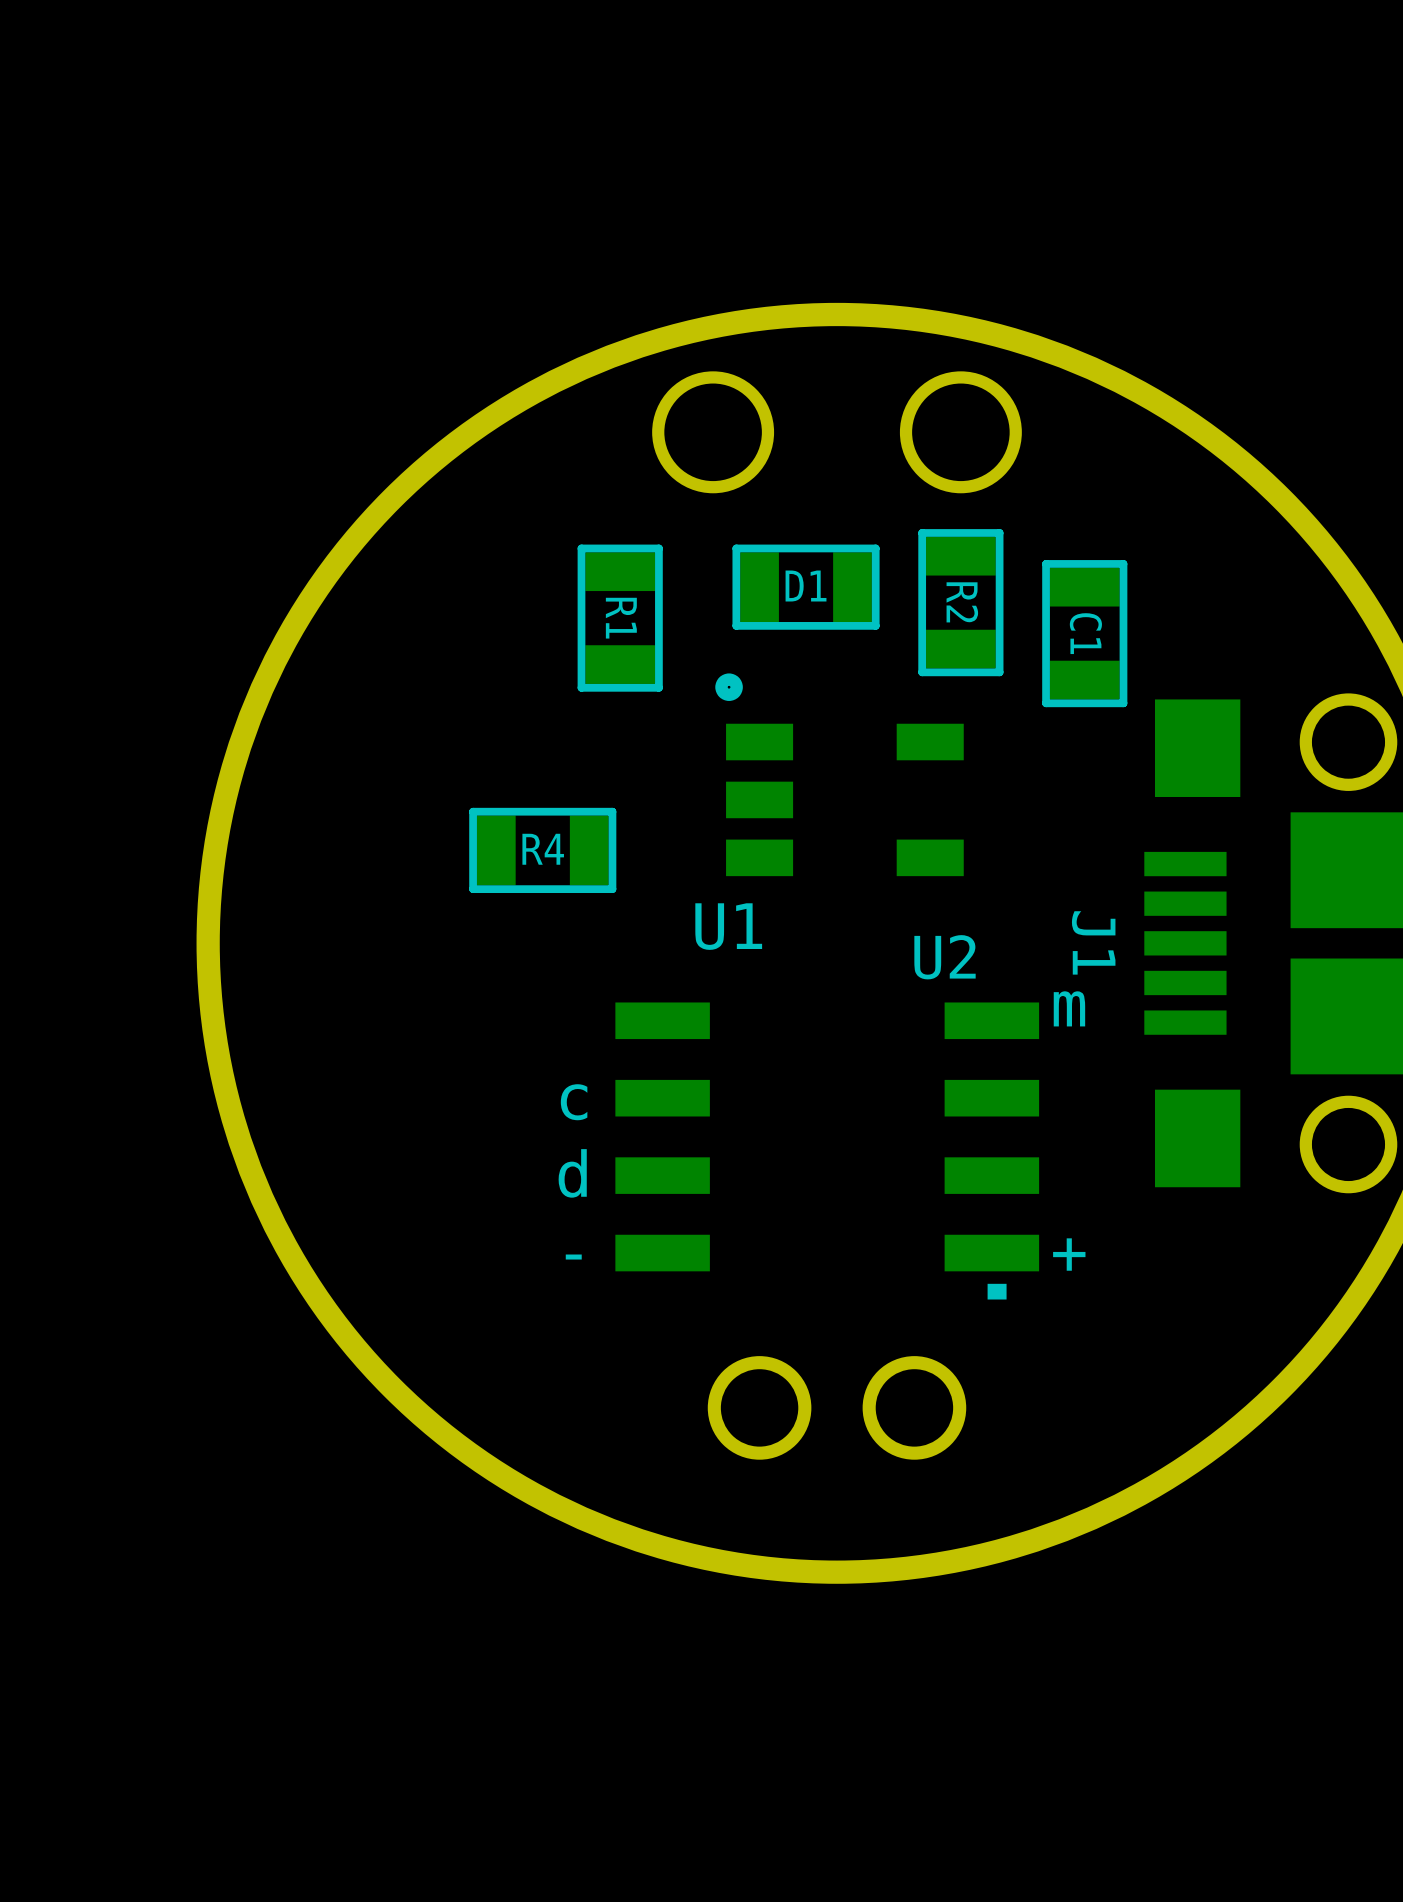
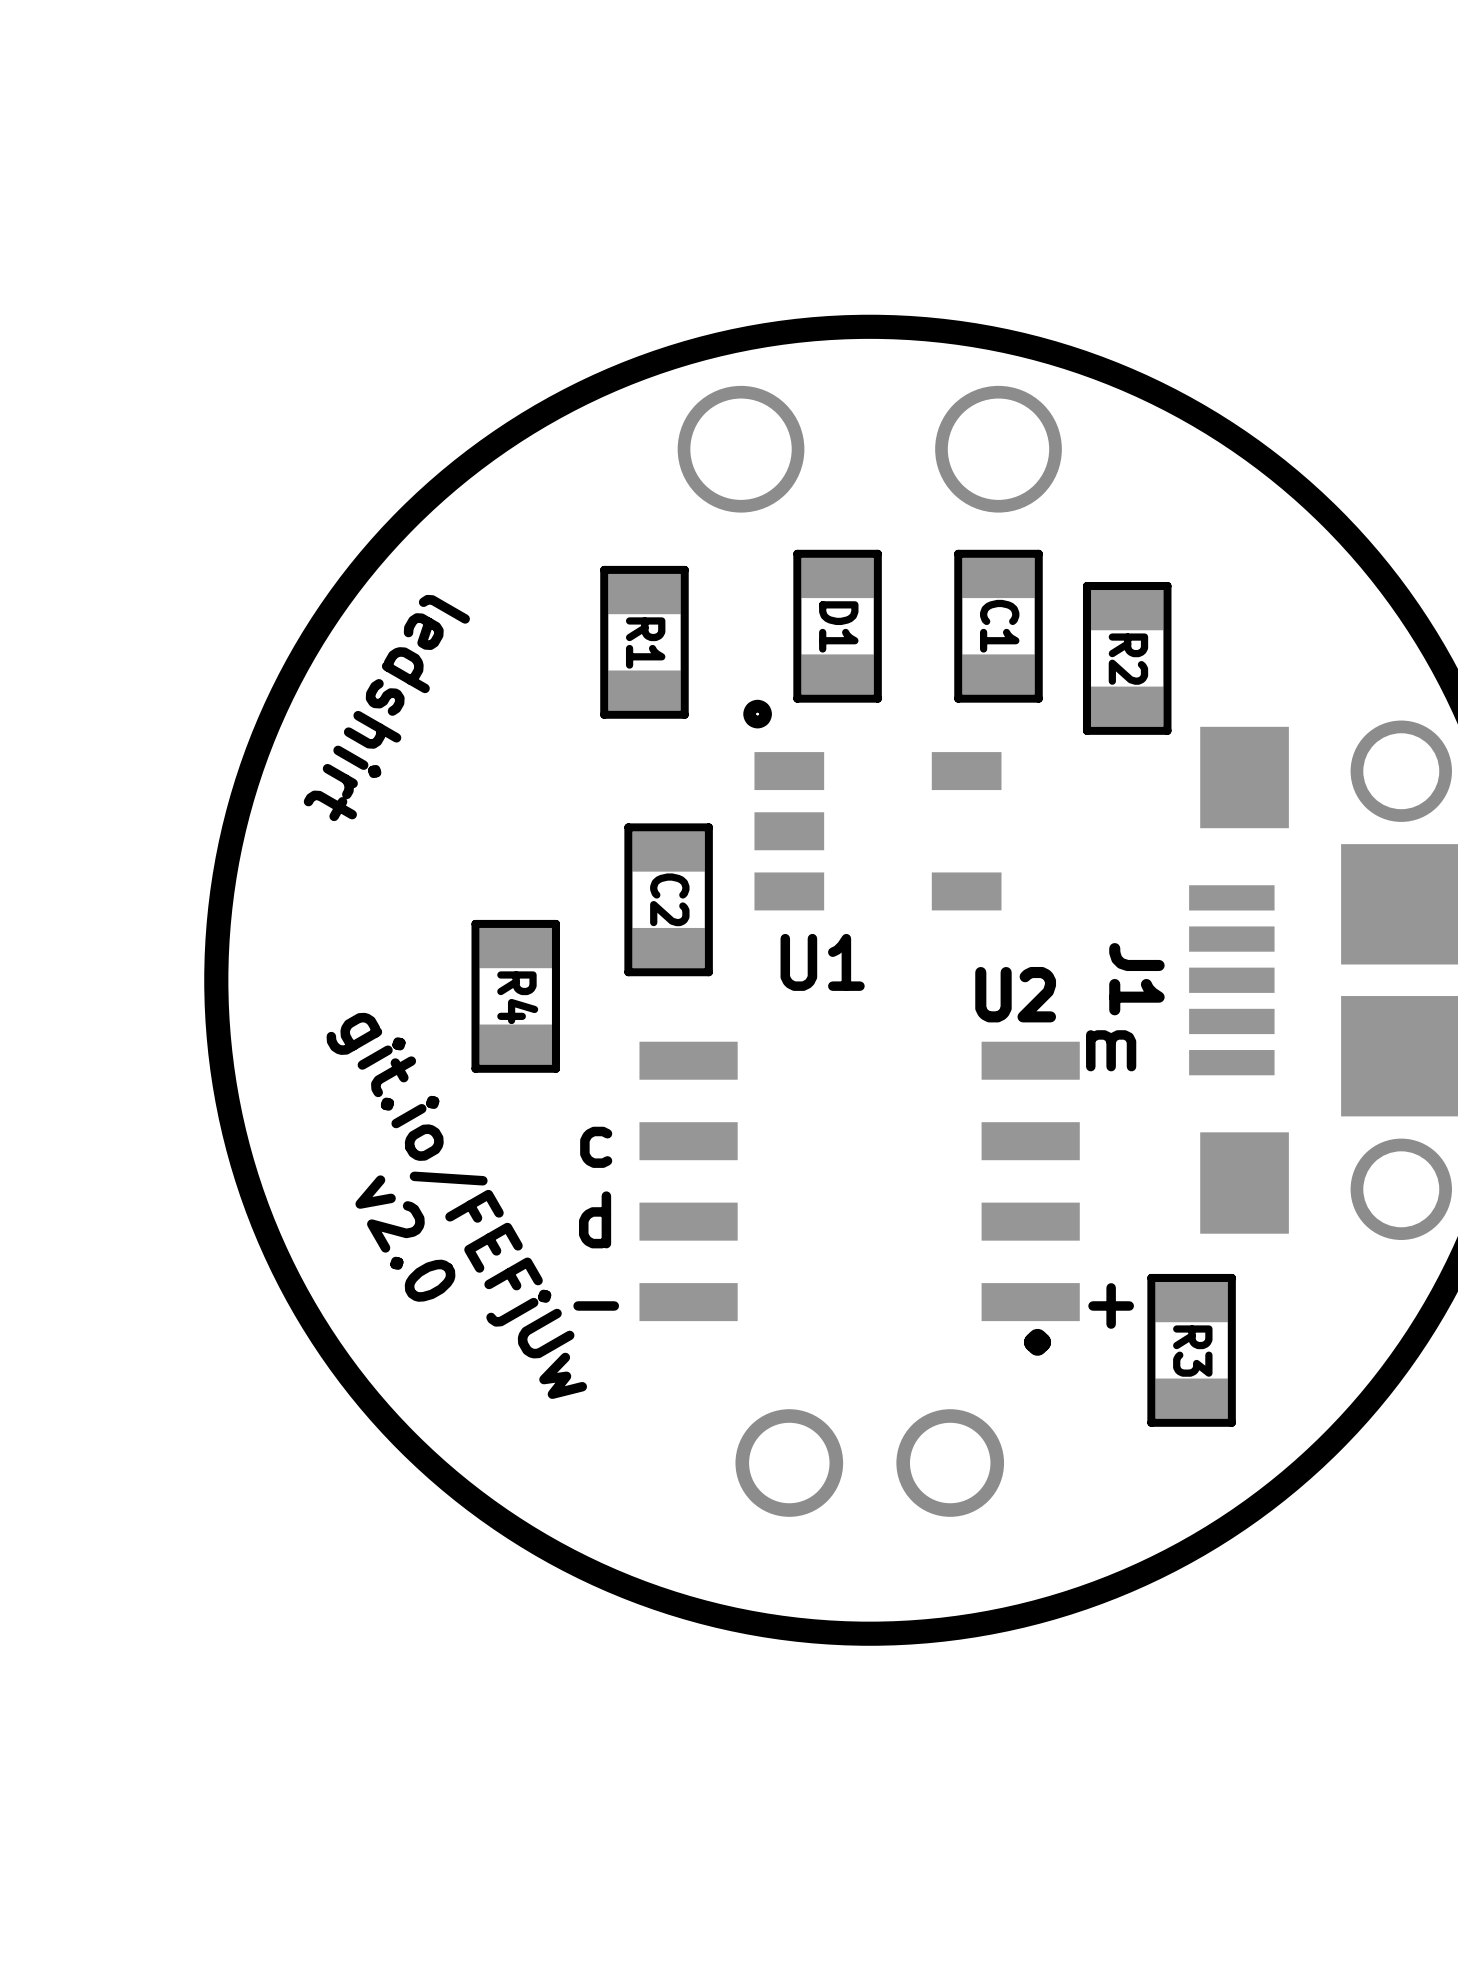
D1 rotation: 0° (806, 587) -> 90° clockwise (837, 626)
R2 name: R2 (962, 602) -> C1 (999, 626)
C1 name: C1 (1085, 633) -> R2 (1128, 659)
text: none -> ledshirt (386, 708)
R4 rotation: 0° (542, 850) -> 90° clockwise (515, 996)
R4 position: (542, 850) -> (515, 996)
C2: none -> (668, 899)
U1 name position: U1 (728, 926) -> U1 (822, 962)
U2 footprint: [615, 1002, 1040, 1272] -> [639, 1041, 1080, 1322]
text: none -> git.io/FEFjUw (456, 1205)
text: none -> v2.0 (405, 1238)
R3: none -> (1191, 1350)

